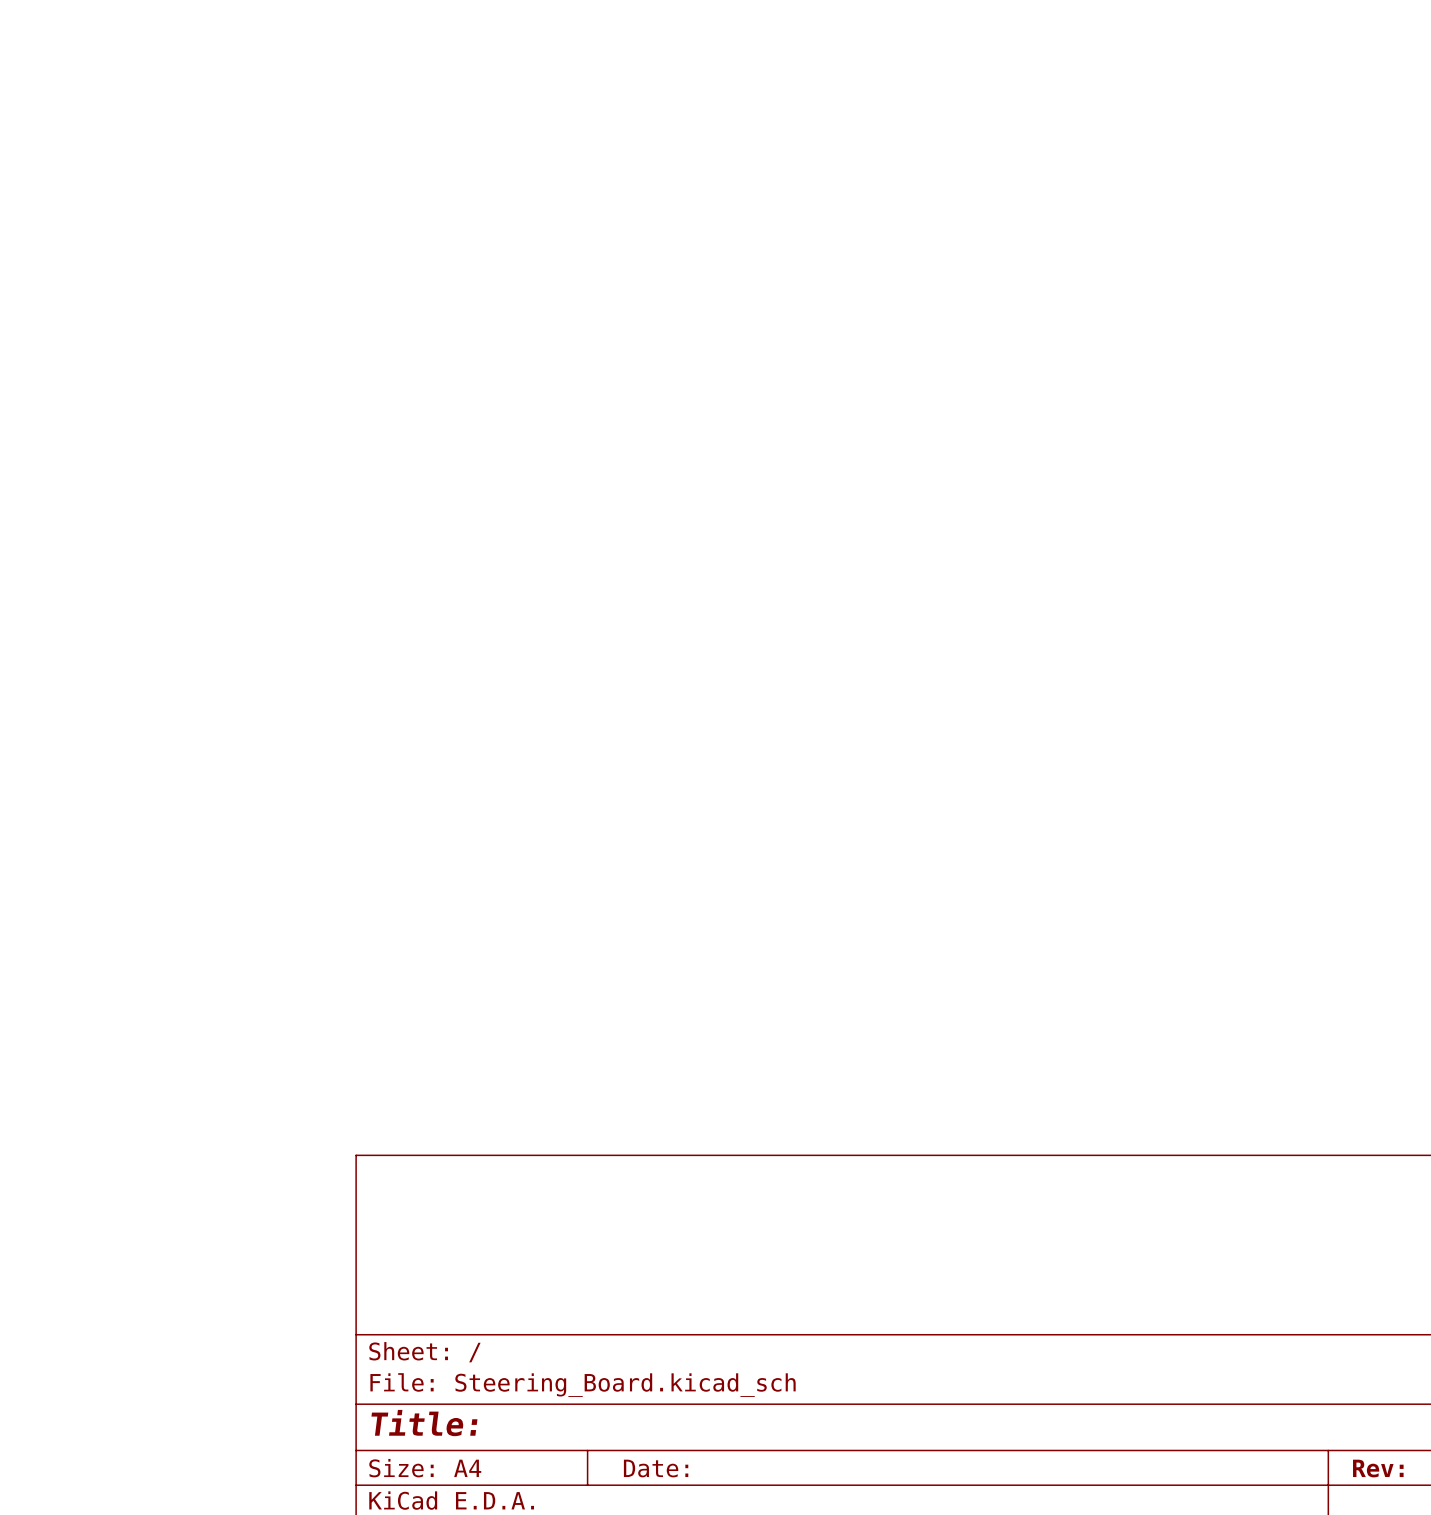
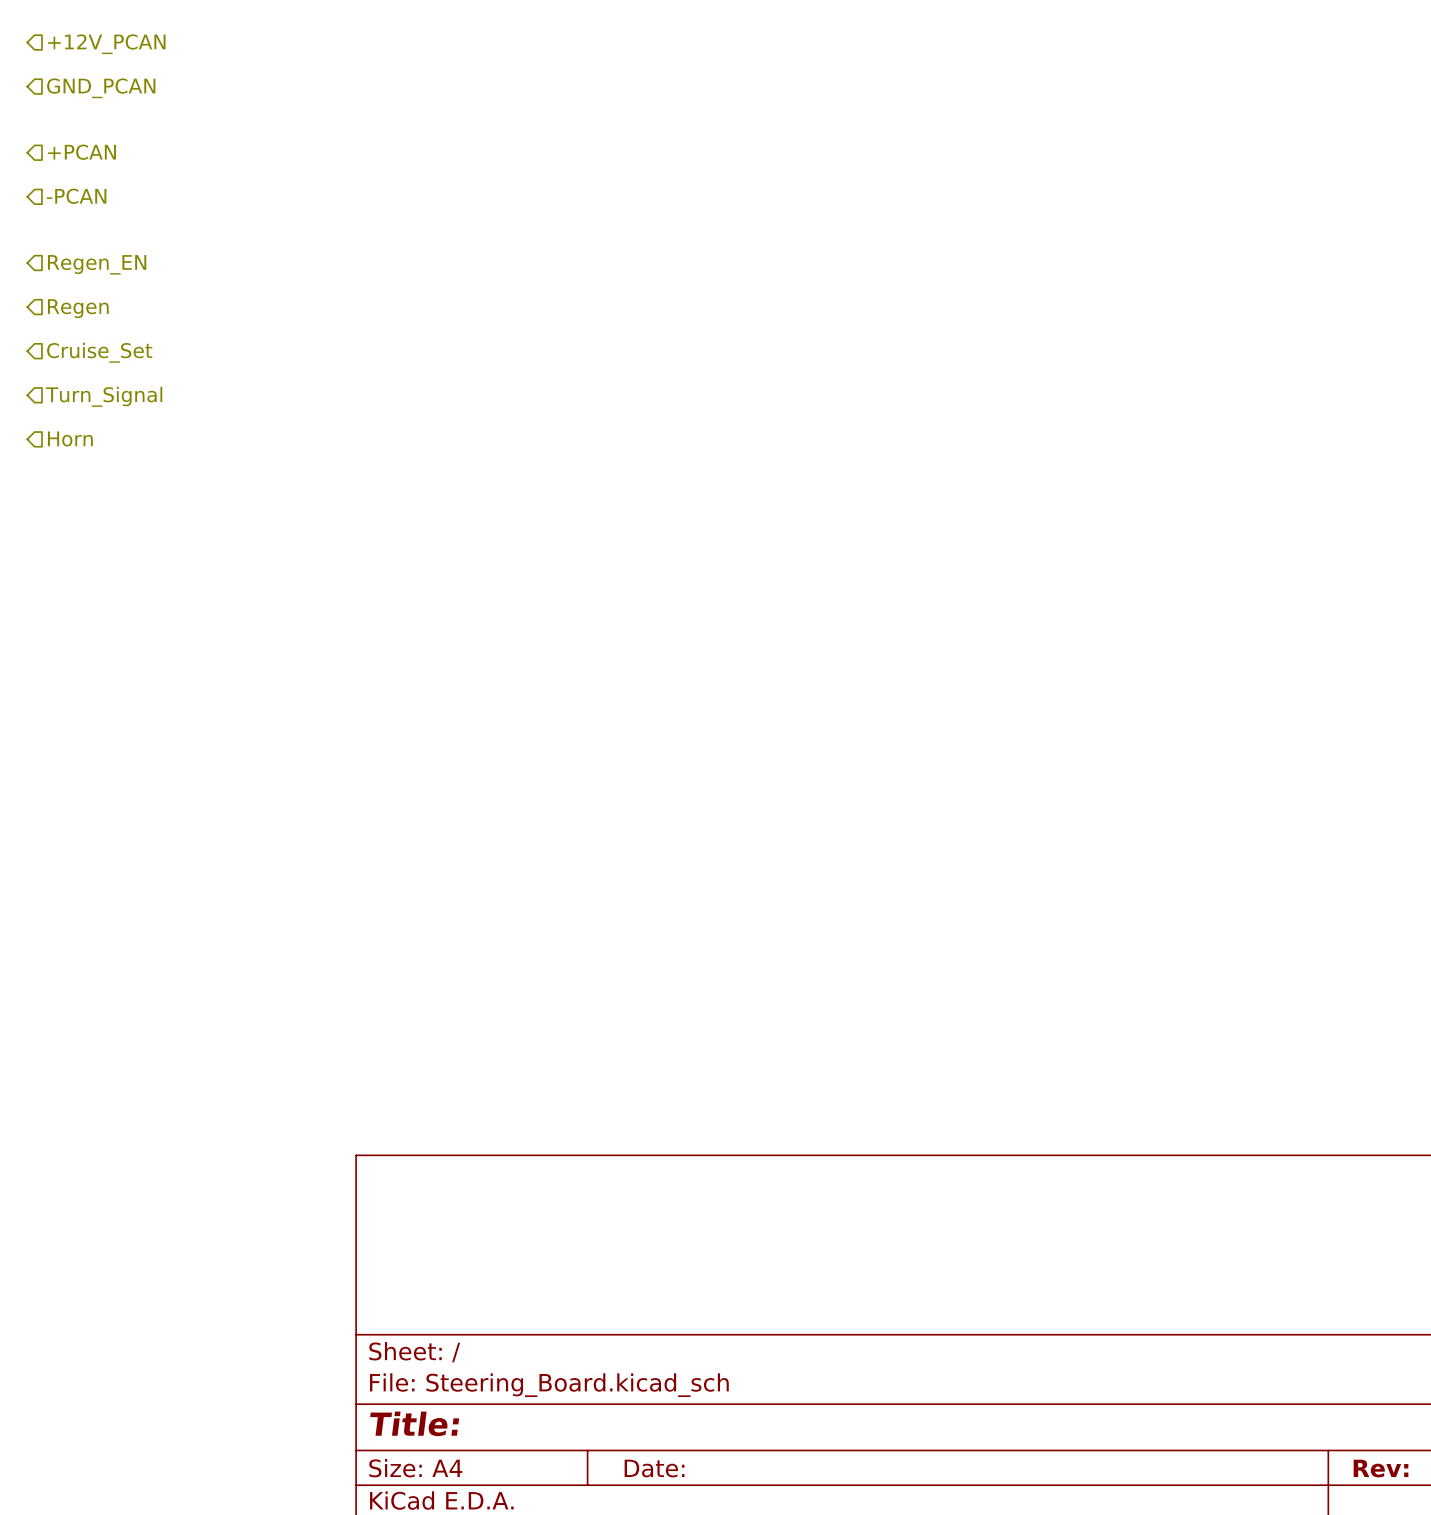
hierarchical label: none -> +12V_PCAN (106, 44)
hierarchical label: none -> GND_PCAN (101, 88)
hierarchical label: none -> +PCAN (82, 152)
hierarchical label: none -> -PCAN (76, 196)
hierarchical label: none -> Regen_EN (97, 264)
hierarchical label: none -> Regen (78, 308)
hierarchical label: none -> Cruise_Set (99, 352)
hierarchical label: none -> Turn_Signal (104, 396)
hierarchical label: none -> Horn (70, 438)

